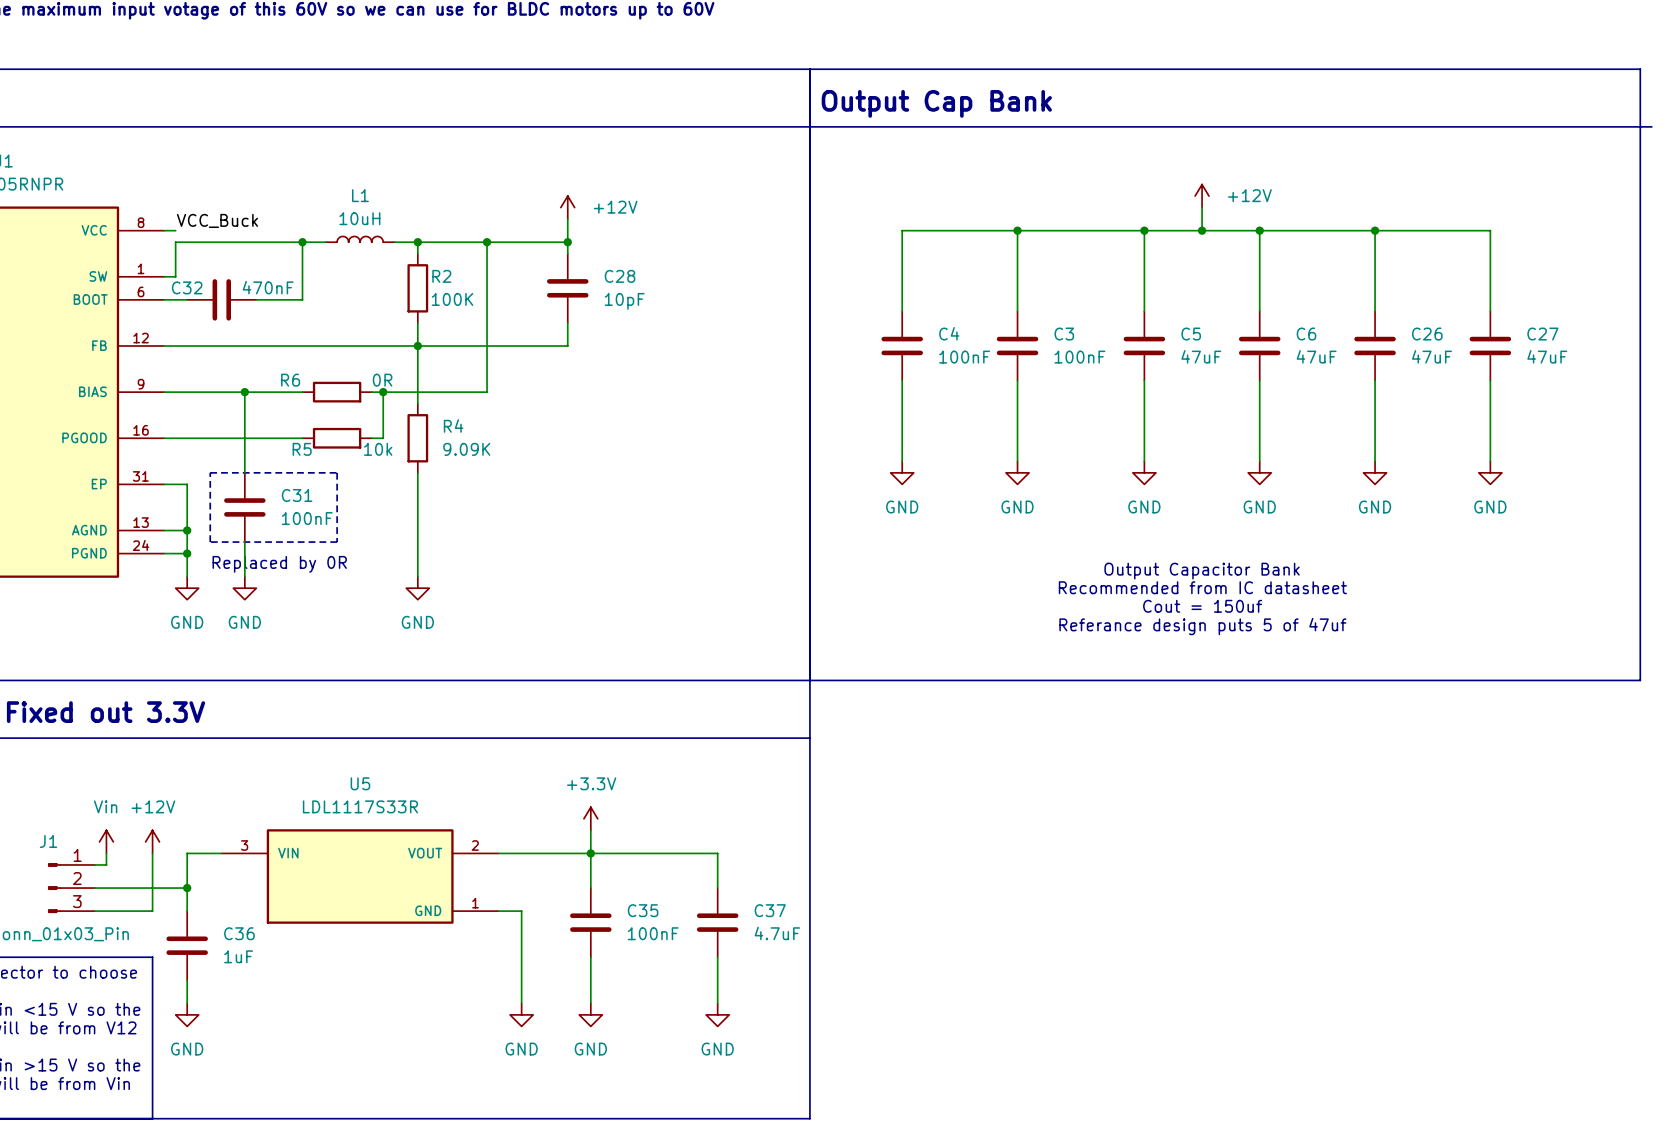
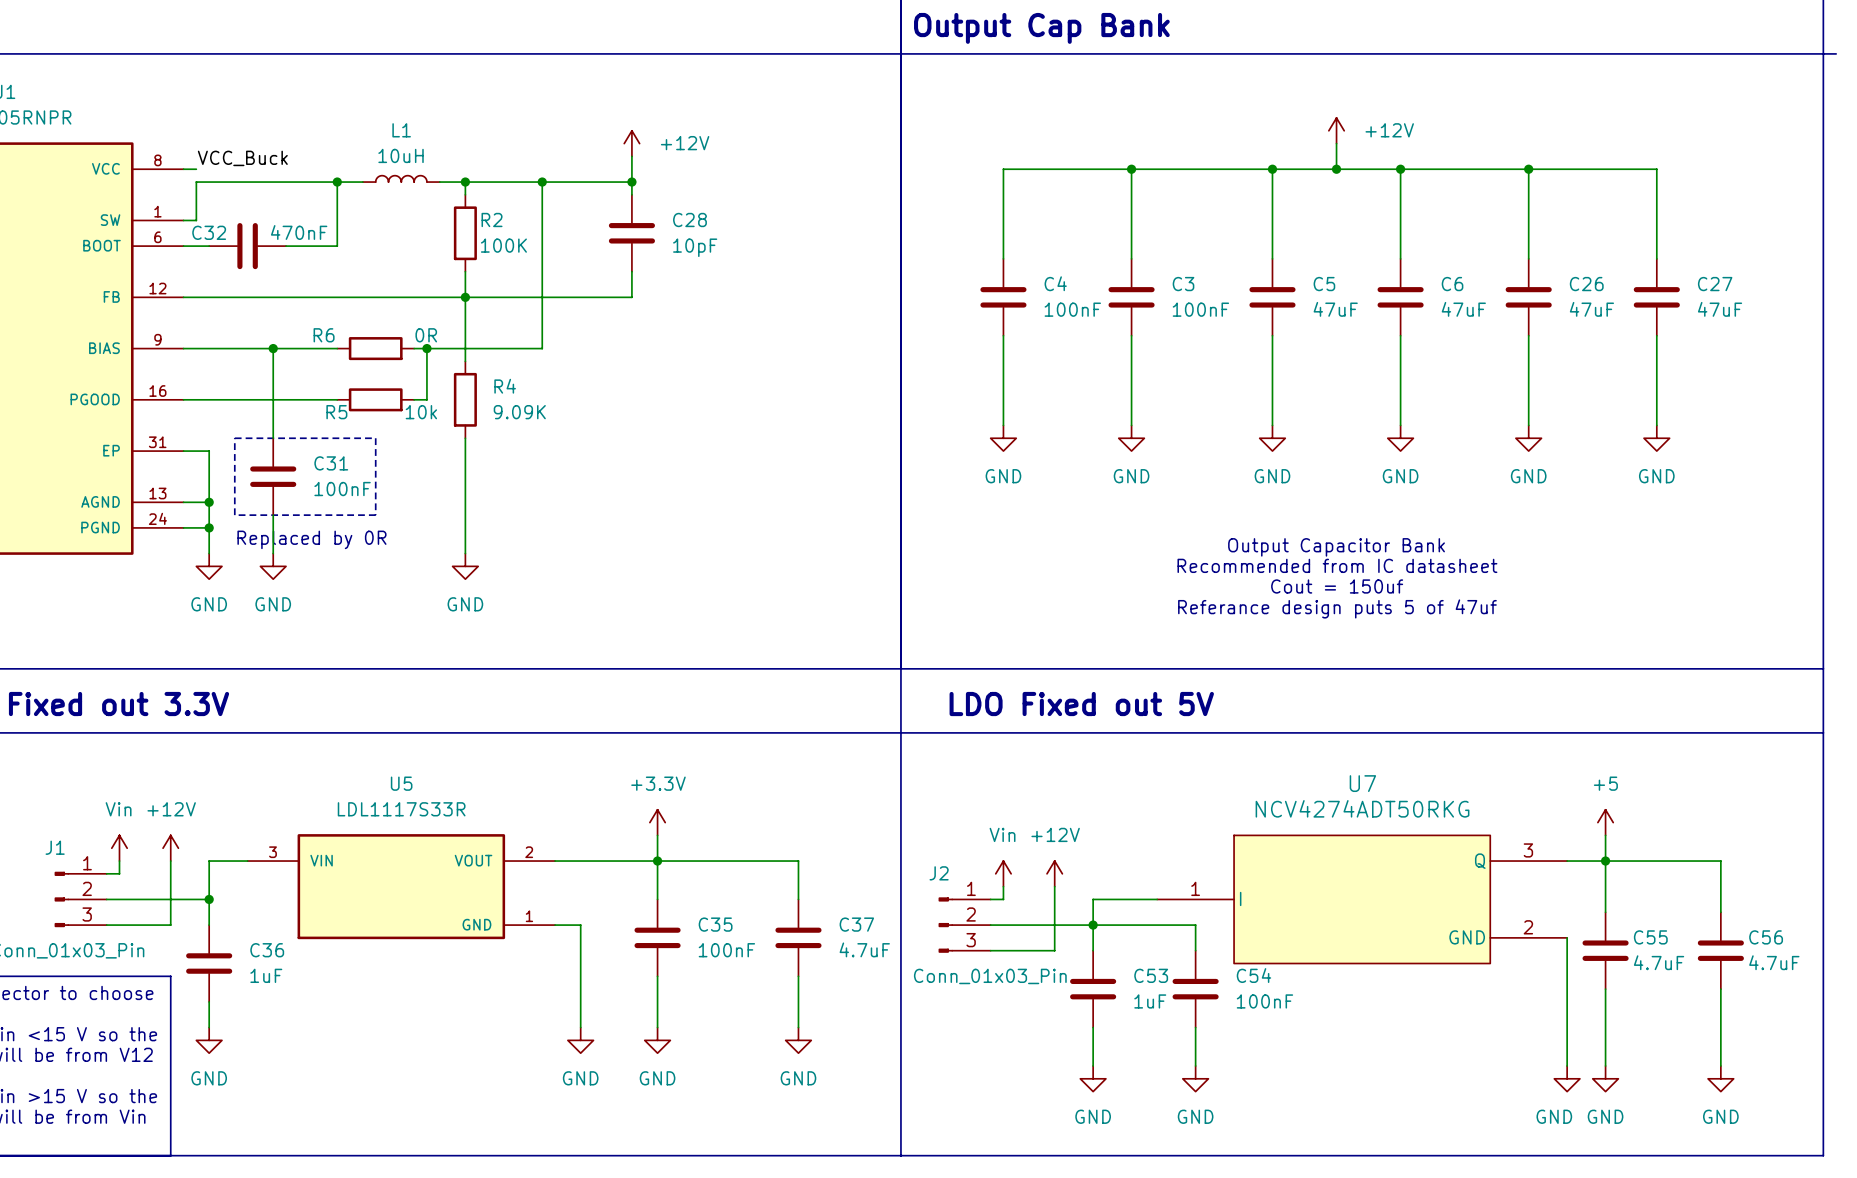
line: none -> (1823, 668) (1823, 1155) (900, 1155)
text: none -> LDO Fixed out 5V (1081, 704)
line: none -> (900, 732) (1823, 732)
power symbol: none -> +5 (1605, 822)
wire: none -> (1605, 835) (1605, 912)
wire: none -> (1567, 861) (1720, 861) (1720, 912)
junction: none -> (1605, 861)
power symbol: none -> Vin (1003, 873)
power symbol: none -> +12V (1054, 873)
wire: none -> (1003, 886) (1003, 899) (990, 899)
wire: none -> (1054, 886) (1054, 950) (990, 950)
wire: none -> (1157, 899) (1093, 899) (1093, 950)
U7: none -> NCV4274ADT50RKG (1362, 899)
J2: none -> Conn_01x03_Pin (964, 925)
wire: none -> (990, 925) (1195, 925) (1195, 950)
junction: none -> (1093, 925)
wire: none -> (1567, 937) (1567, 1065)
C55: none -> 4.7uF (1605, 950)
C56: none -> 4.7uF (1720, 950)
C53: none -> 1uF (1093, 989)
C54: none -> 100nF (1195, 989)
wire: none -> (1605, 989) (1605, 1065)
wire: none -> (1720, 989) (1720, 1065)
wire: none -> (1093, 1027) (1093, 1065)
wire: none -> (1195, 1027) (1195, 1065)
power symbol: none -> GND (1093, 1078)
power symbol: none -> GND (1195, 1078)
power symbol: none -> GND (1567, 1078)
power symbol: none -> GND (1605, 1078)
power symbol: none -> GND (1720, 1078)

